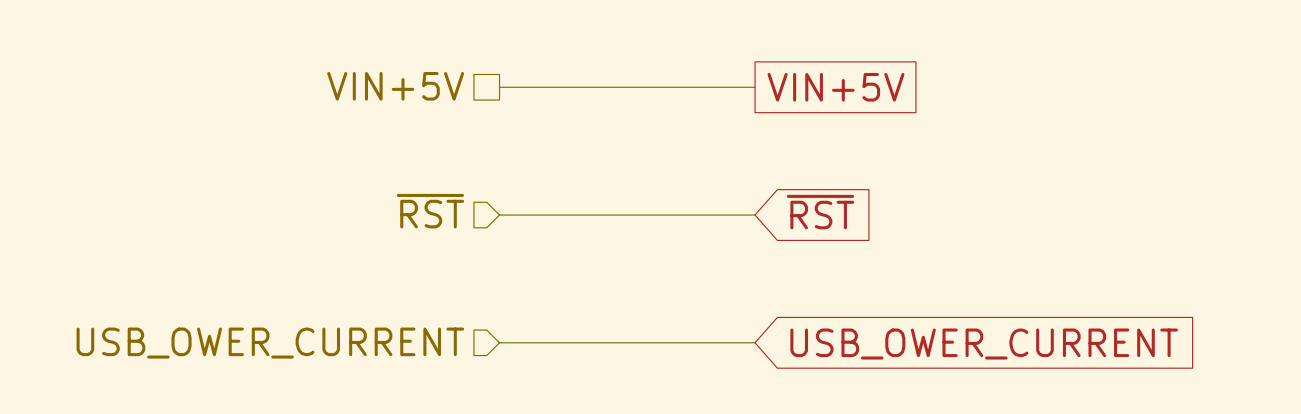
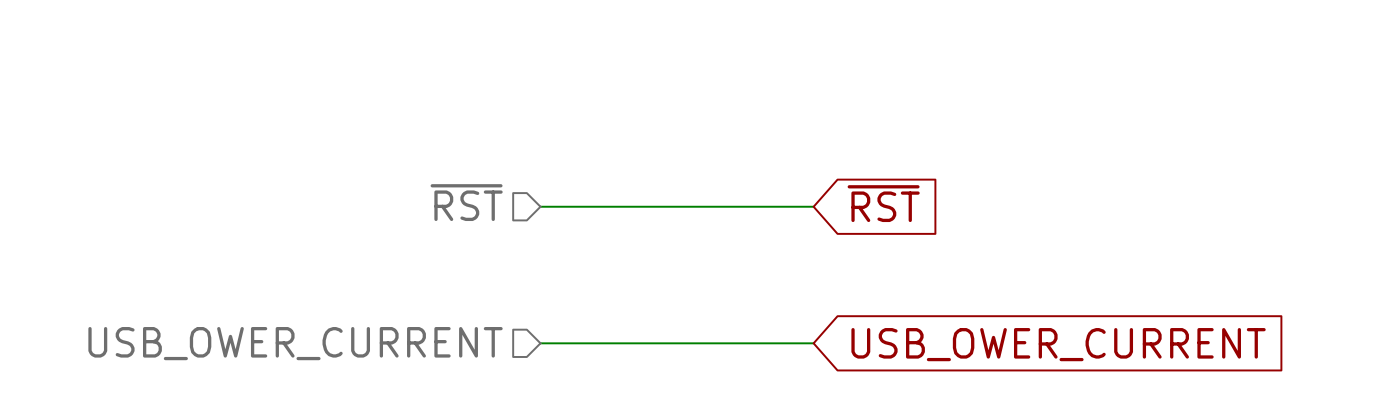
hierarchical label: VIN+5V (395, 86) -> none
wire: (499, 87) (755, 87) -> none
global label: VIN+5V (836, 87) -> none

